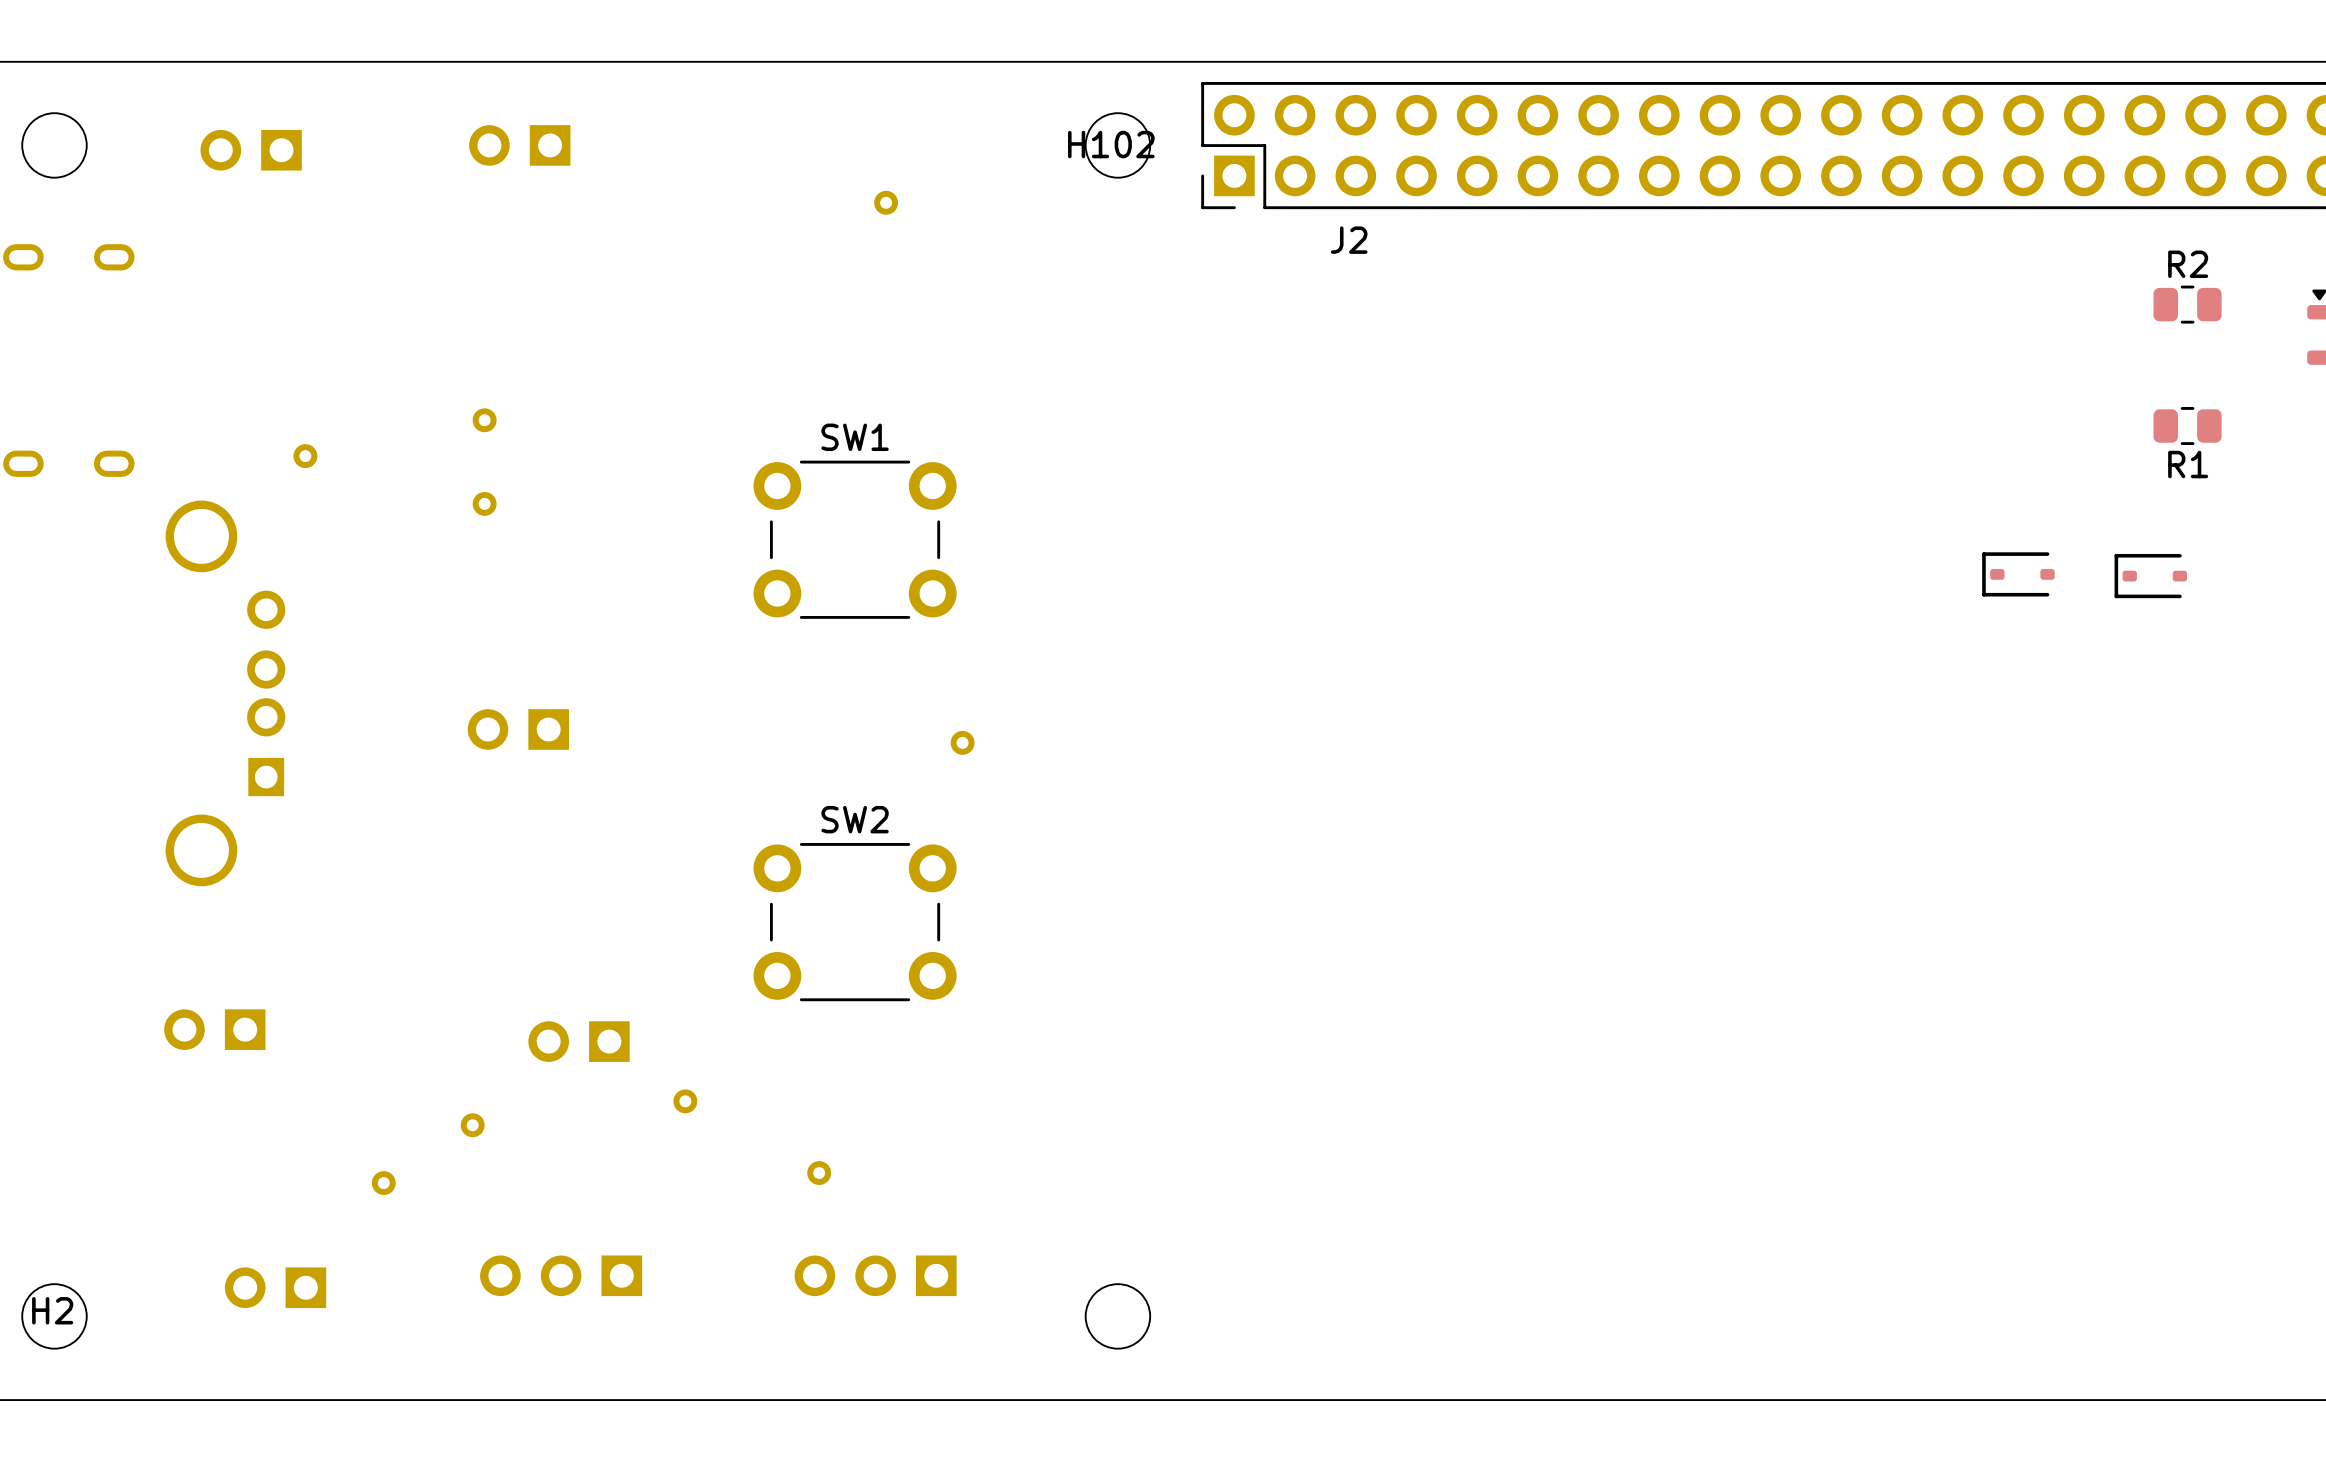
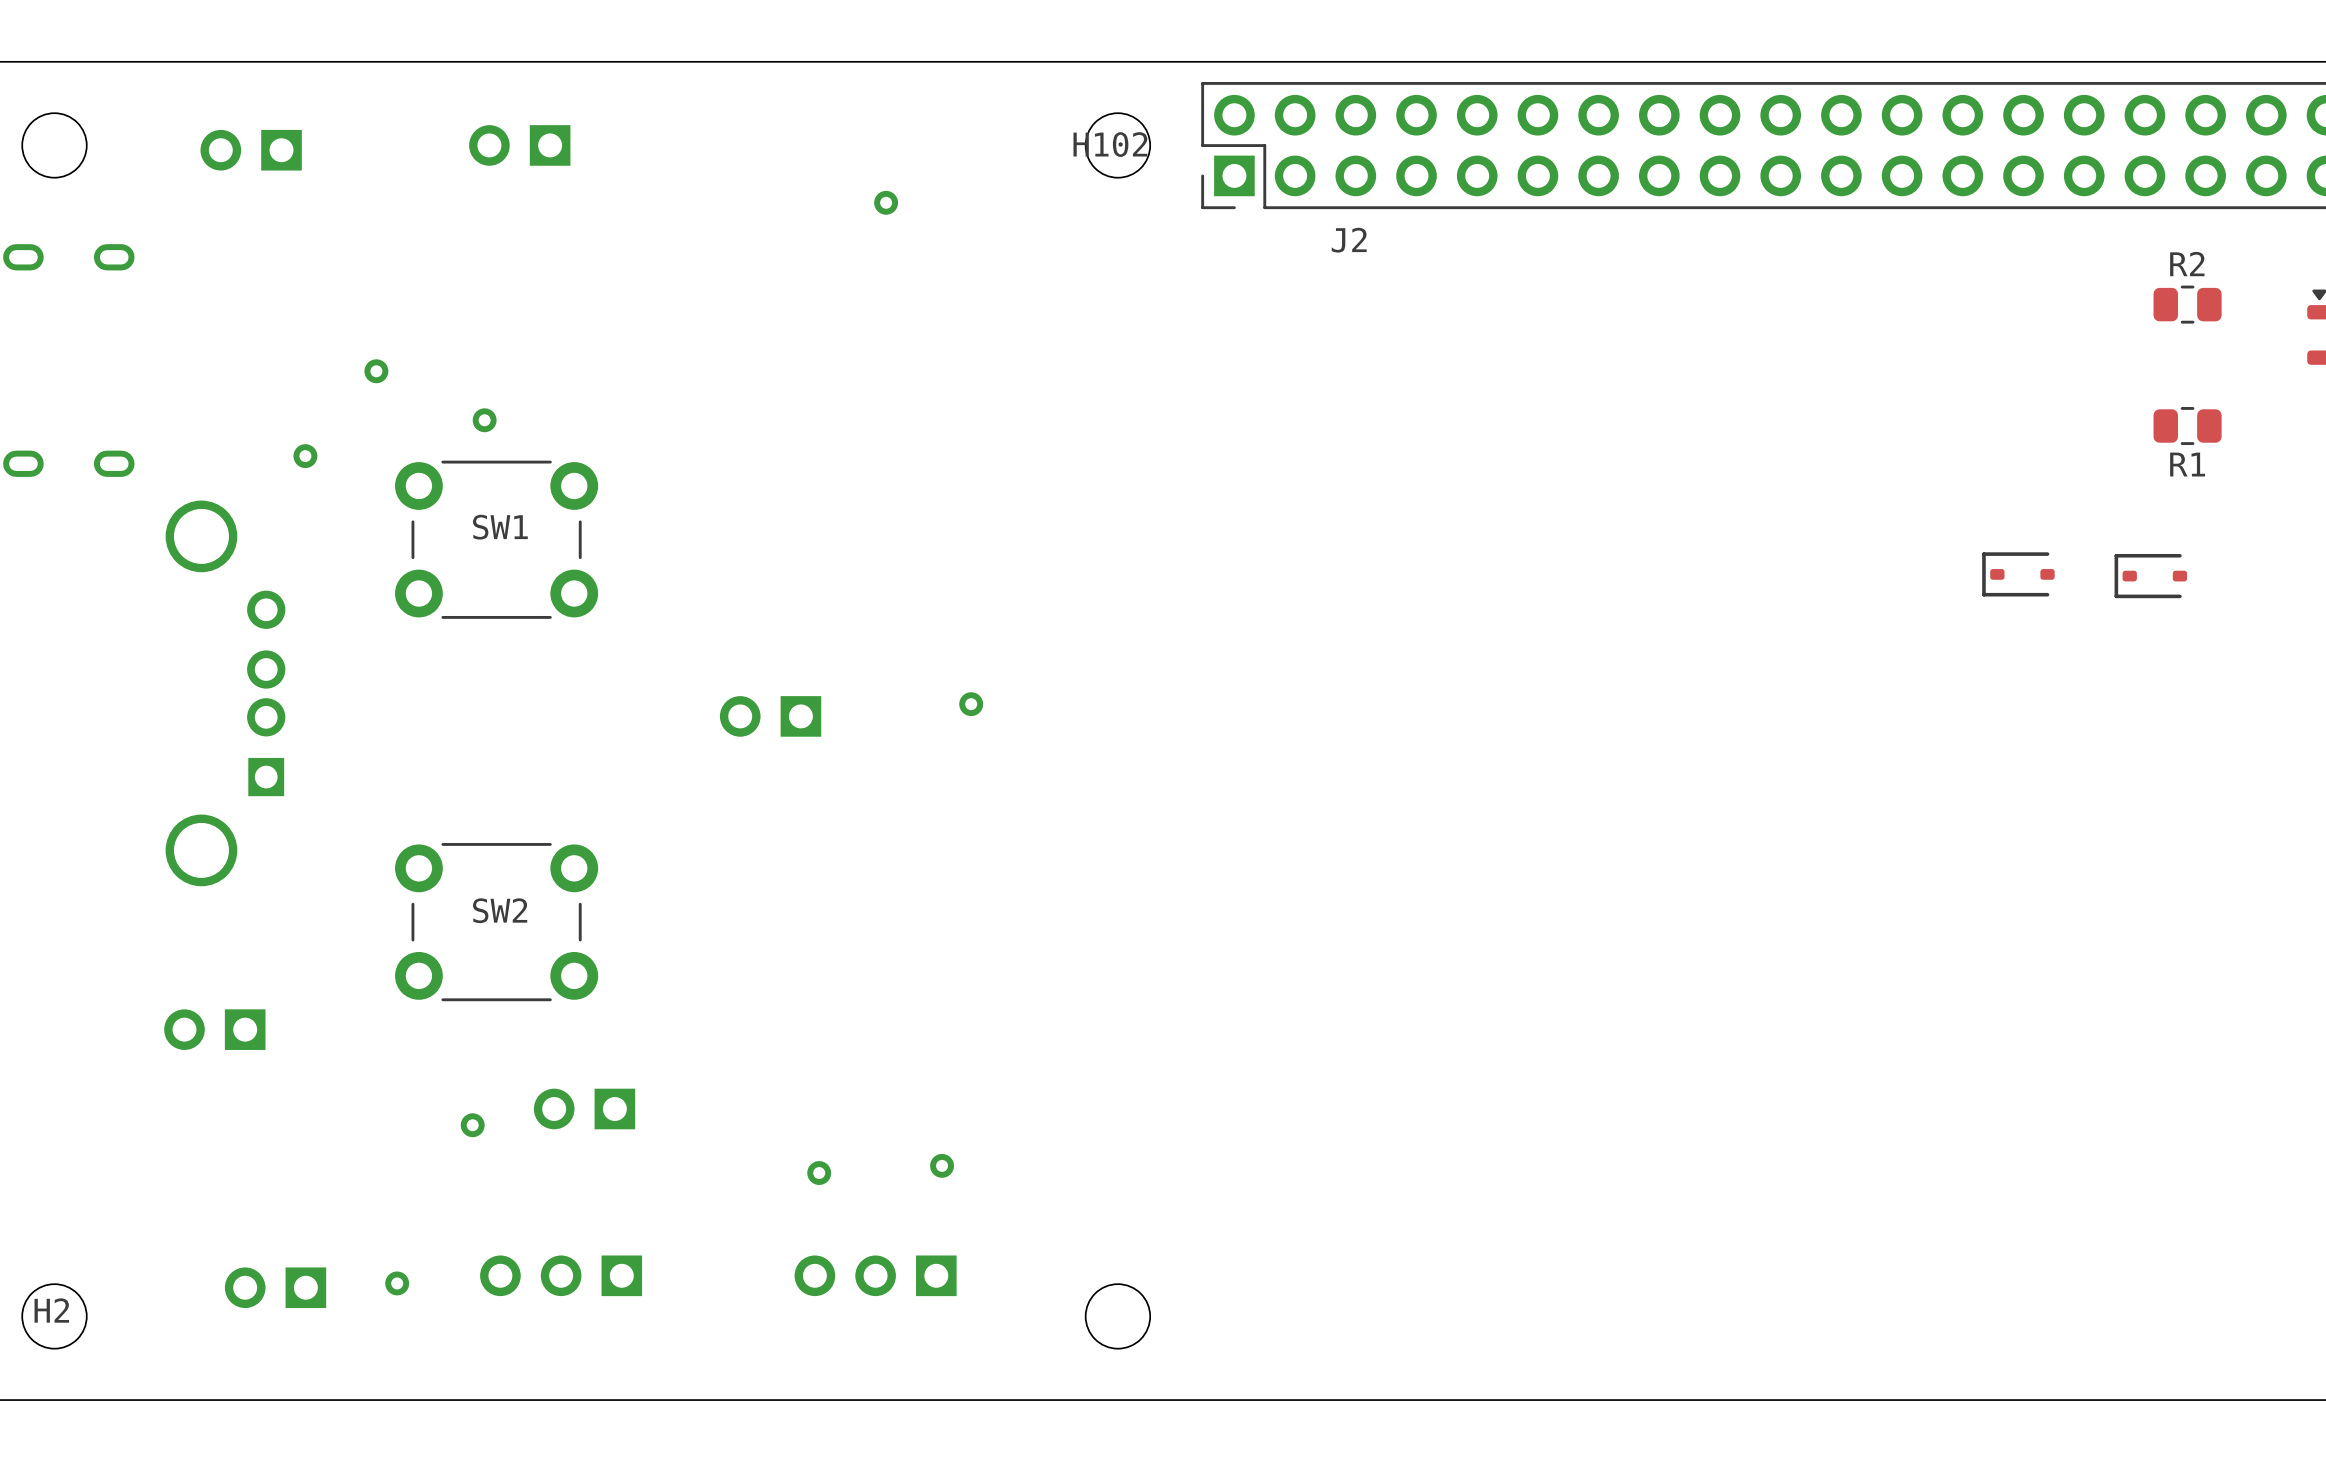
SW1 name position: SW1 (855, 437) -> SW1 (500, 527)
part position: (484, 503) -> (376, 371)
SW1 position: (855, 539) -> (496, 539)
part: none -> (770, 716)
part: (518, 729) -> none
part position: (962, 742) -> (971, 704)
SW2 name position: SW2 (855, 819) -> SW2 (500, 910)
SW2 position: (855, 922) -> (496, 922)
part position: (579, 1041) -> (584, 1108)
part: (685, 1101) -> none
part: none -> (942, 1165)
part position: (383, 1183) -> (397, 1283)

